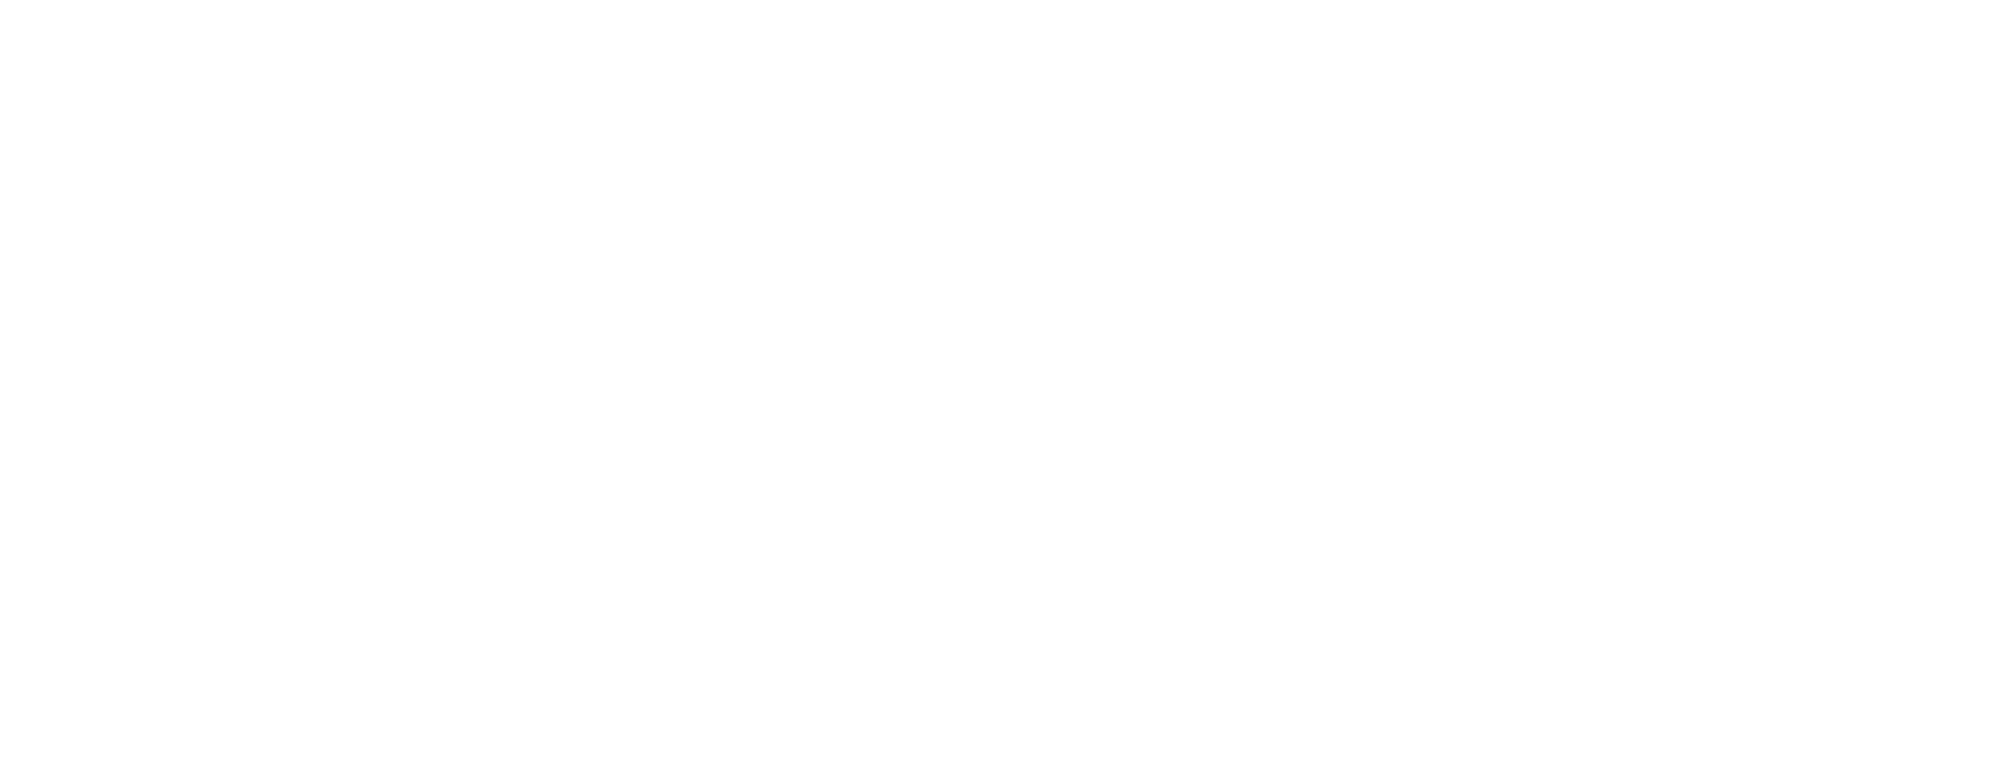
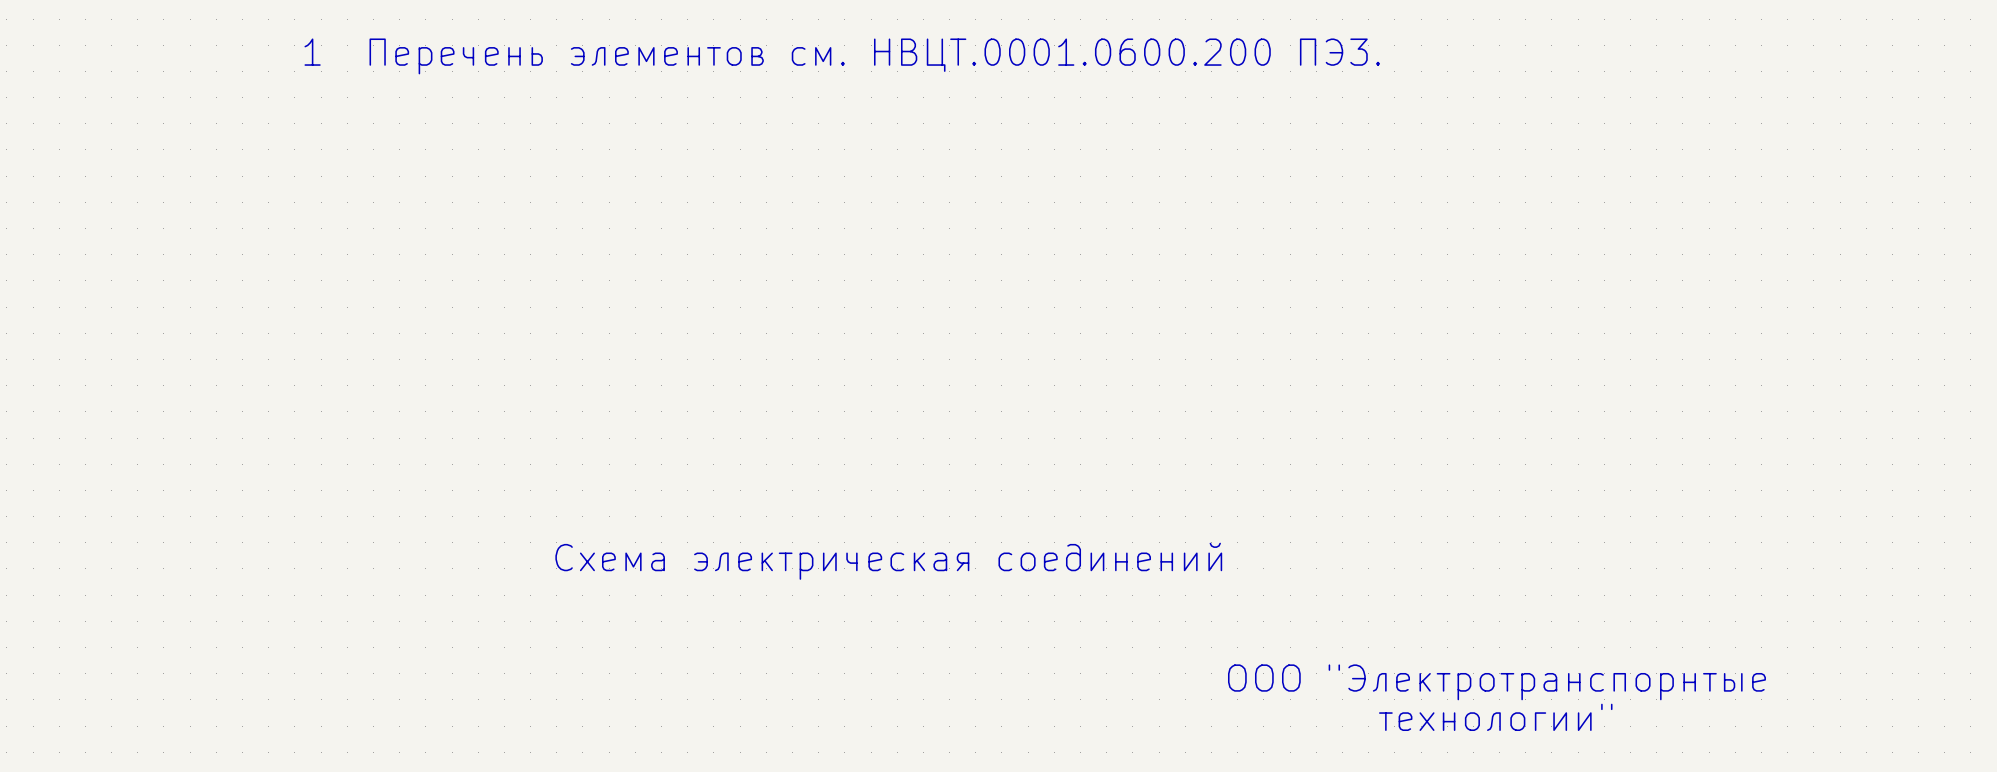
text: none -> 1 Перечень элементов см. НВЦТ.0001.0600.200 ПЭ3. (842, 56)
text: none -> Схема электрическая соединений (888, 561)
text: none -> ООО "Электротранспорнтые (1496, 682)
text: none -> технологии" (1495, 717)

